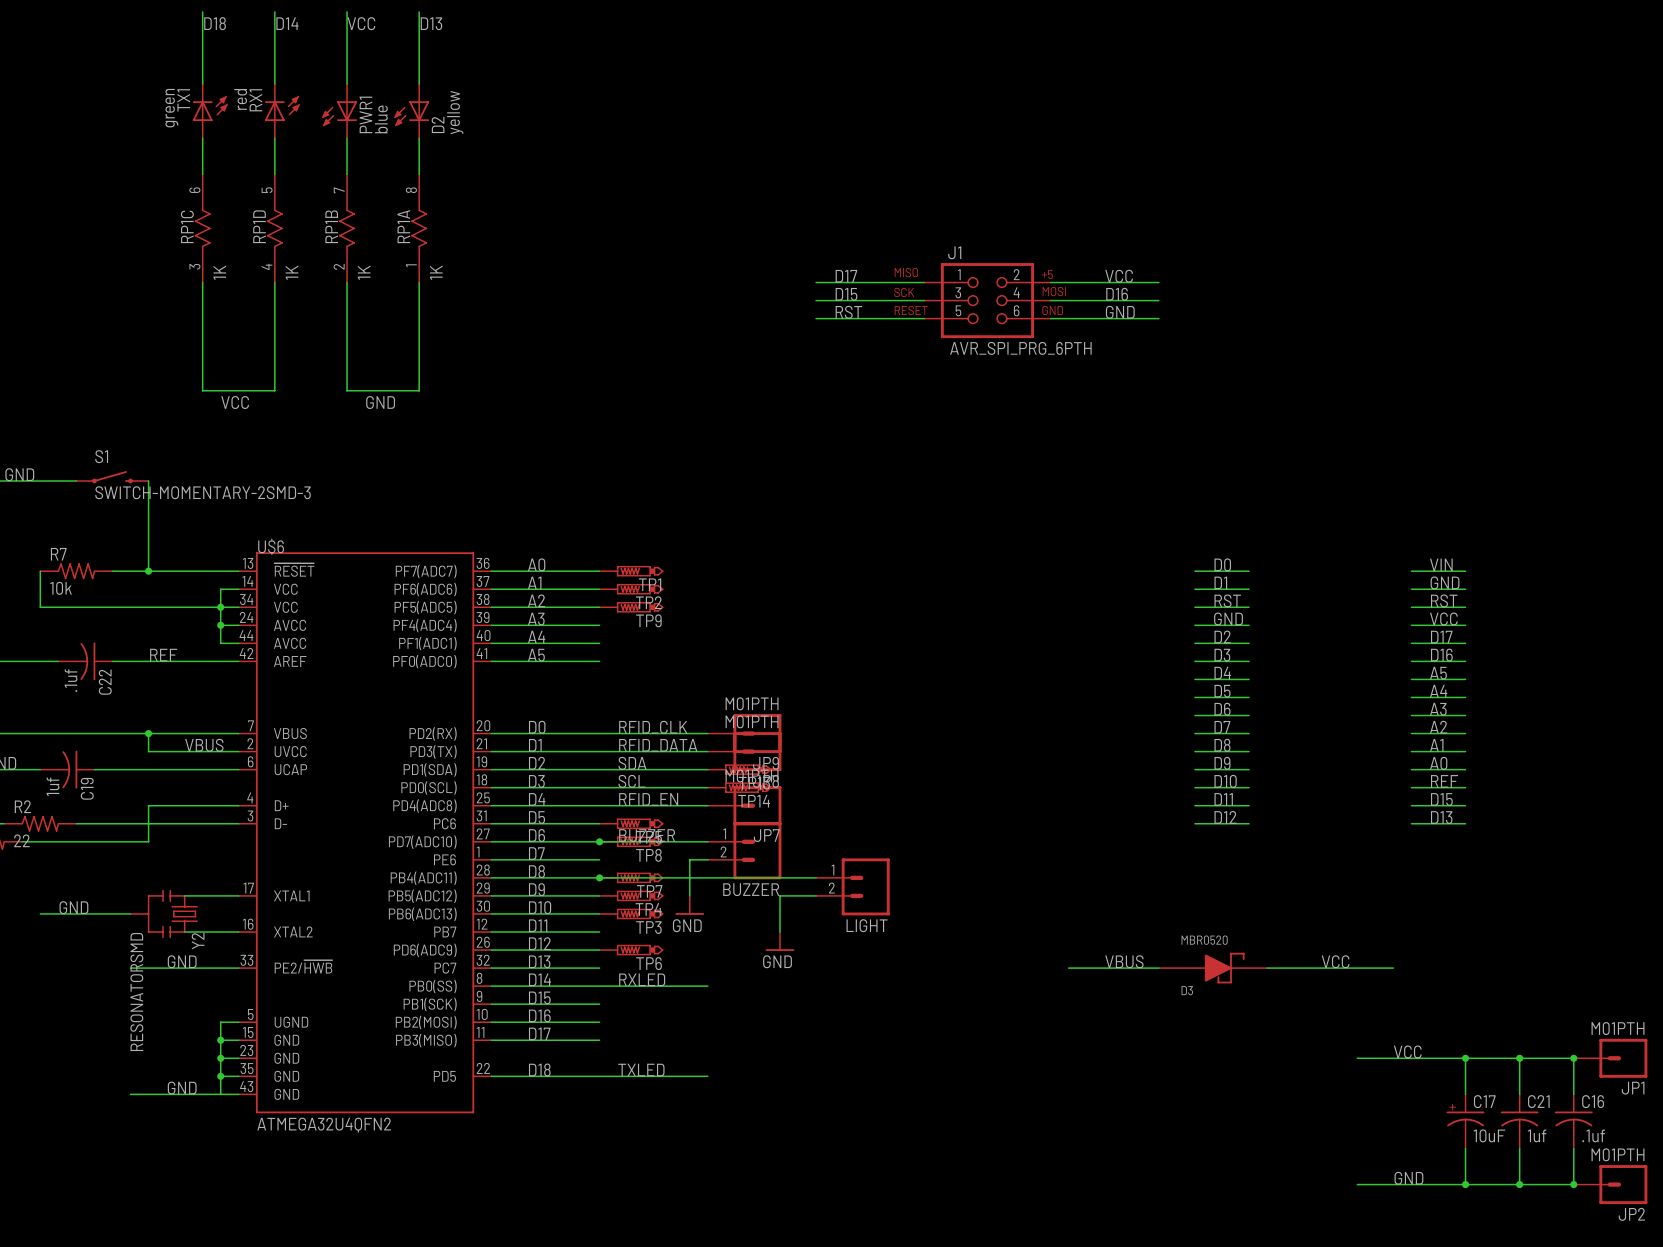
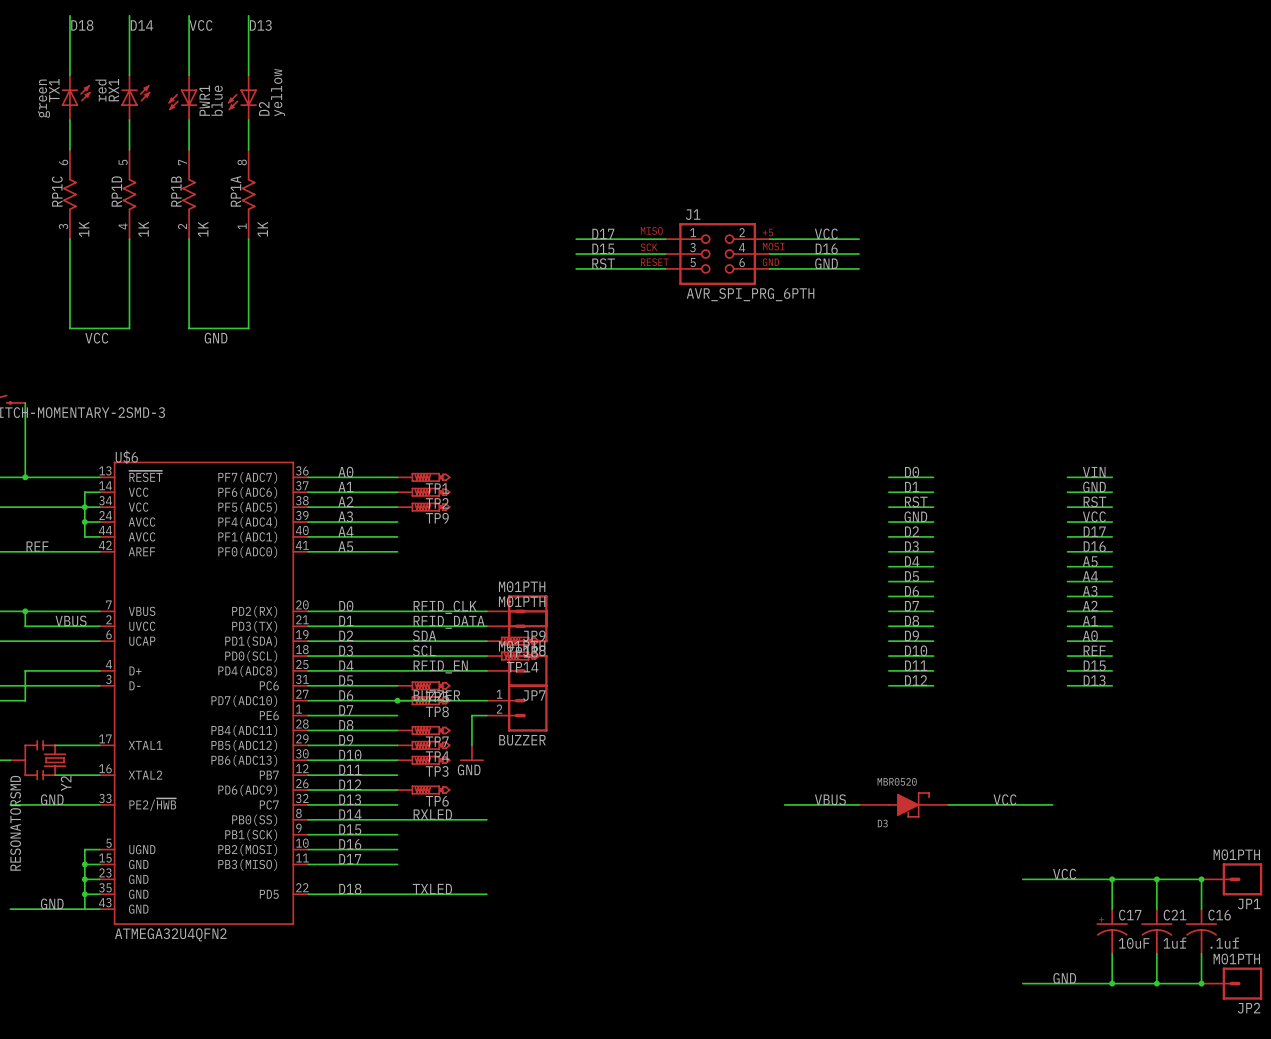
wire: (599, 877) (816, 877) -> none
junction: (599, 877) -> none
LIGHT: (852, 886) -> none
wire: (816, 895) (779, 895) (779, 932) -> none
power symbol: GND (779, 941) -> none

